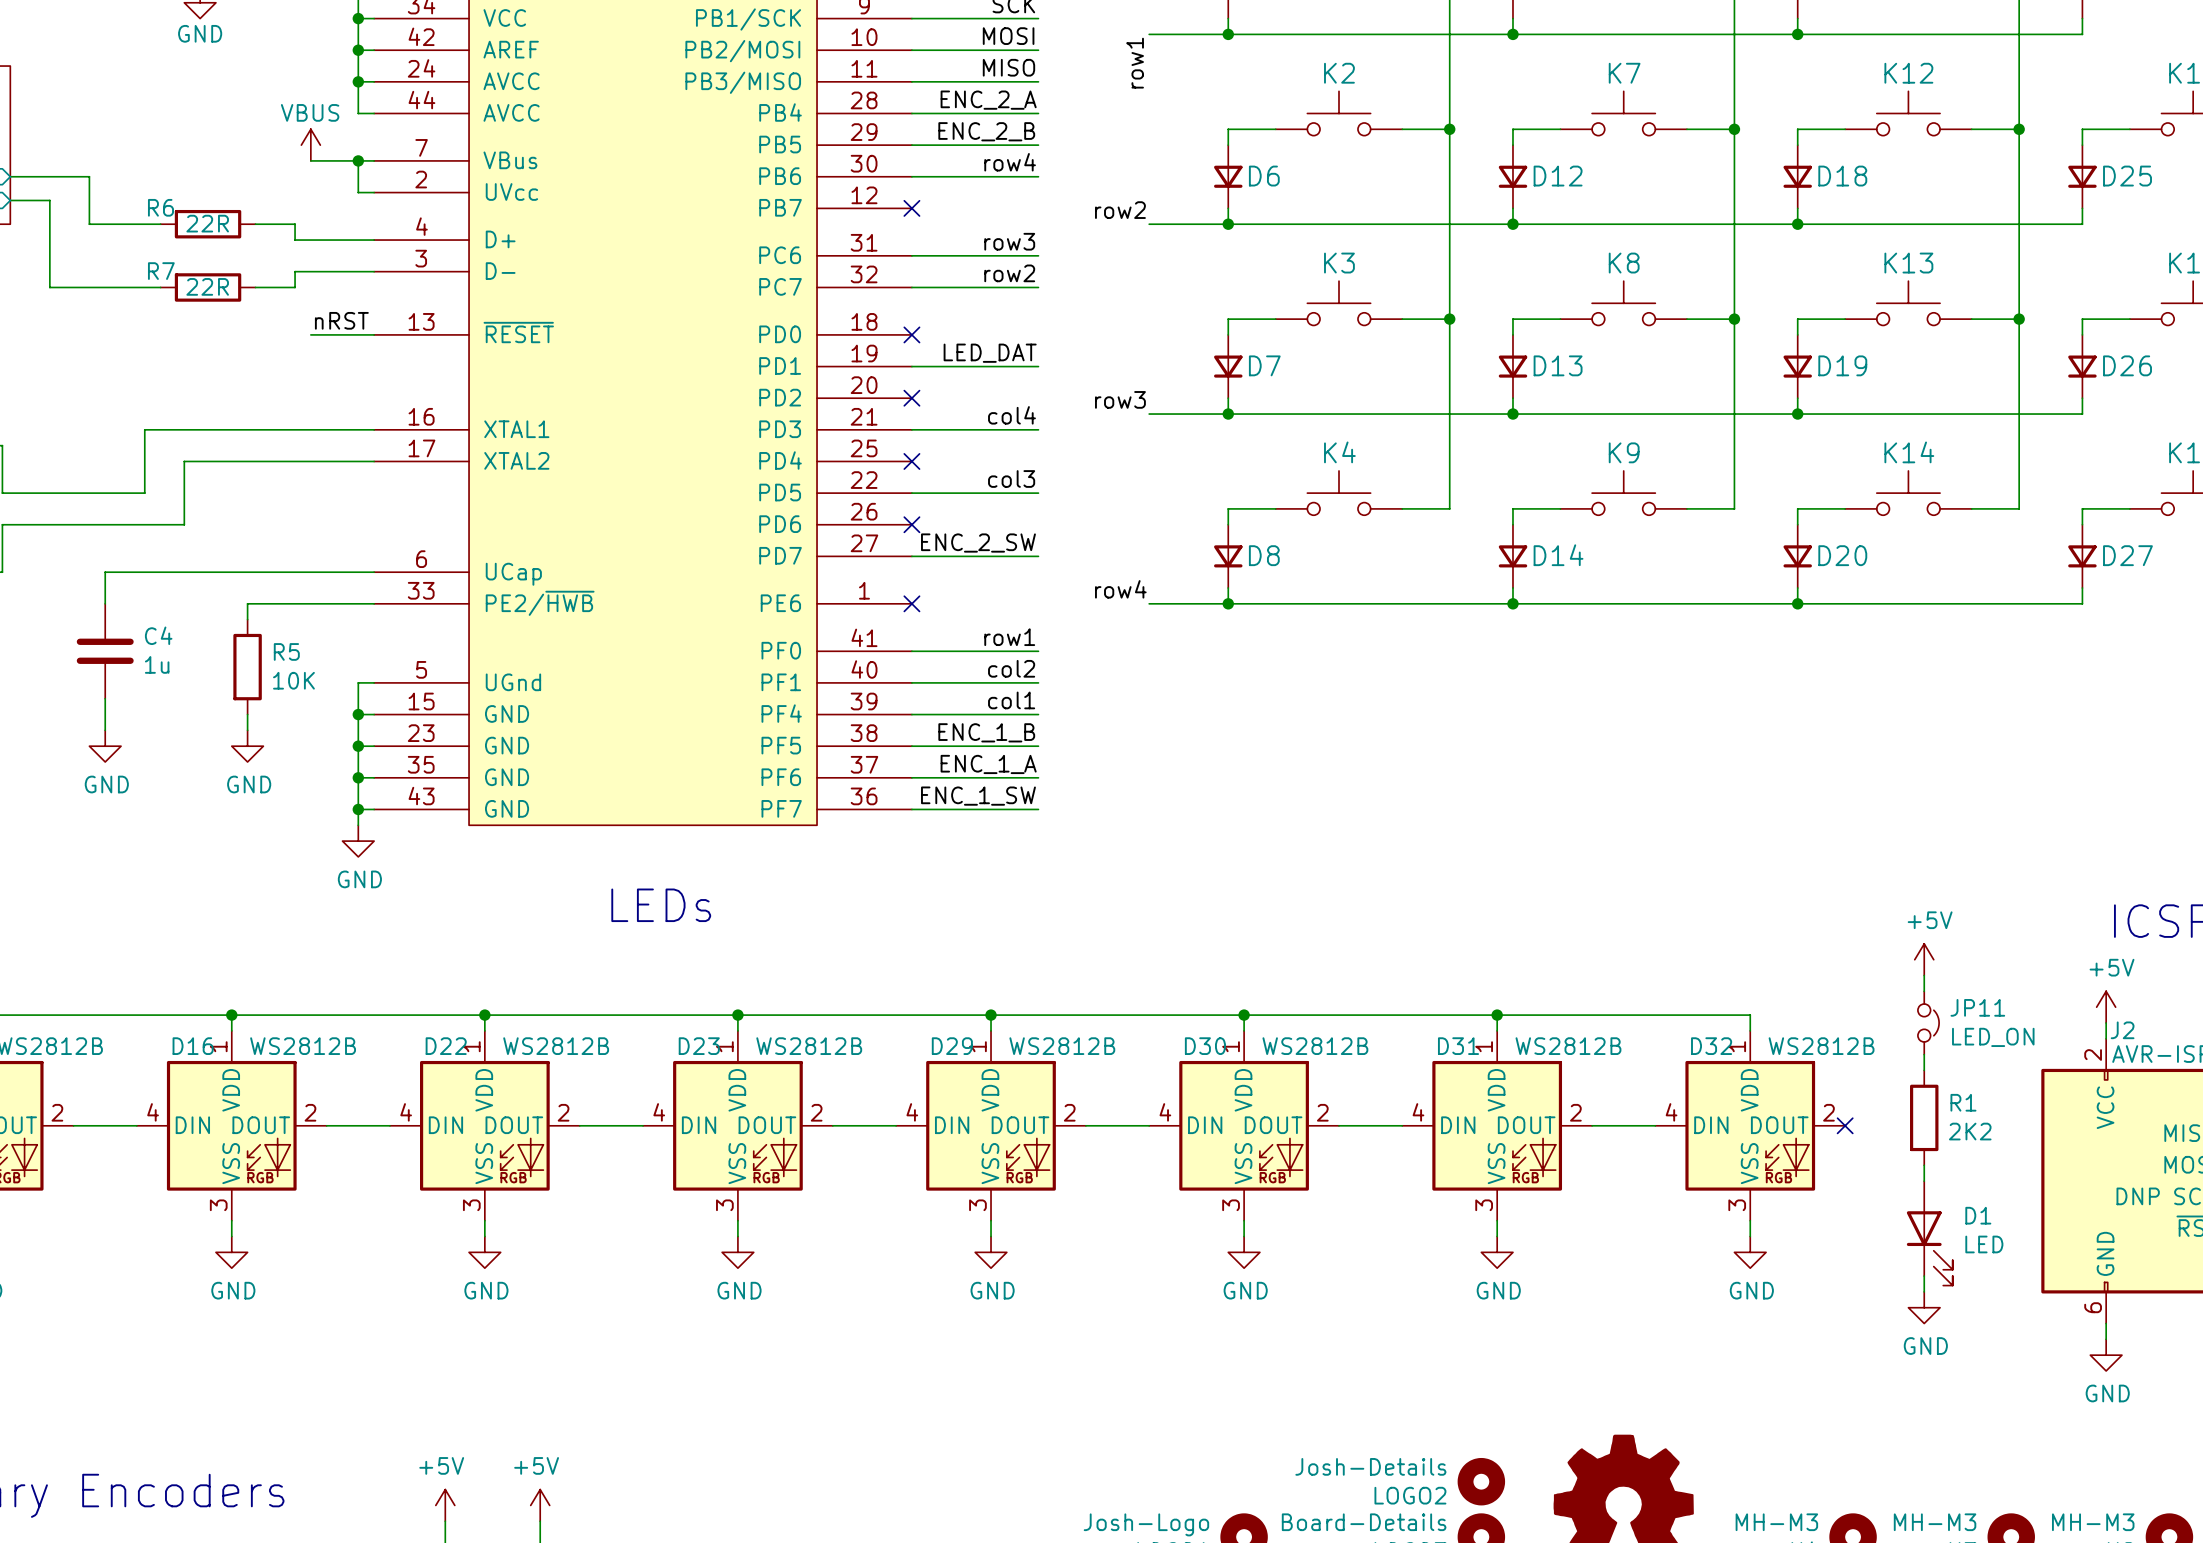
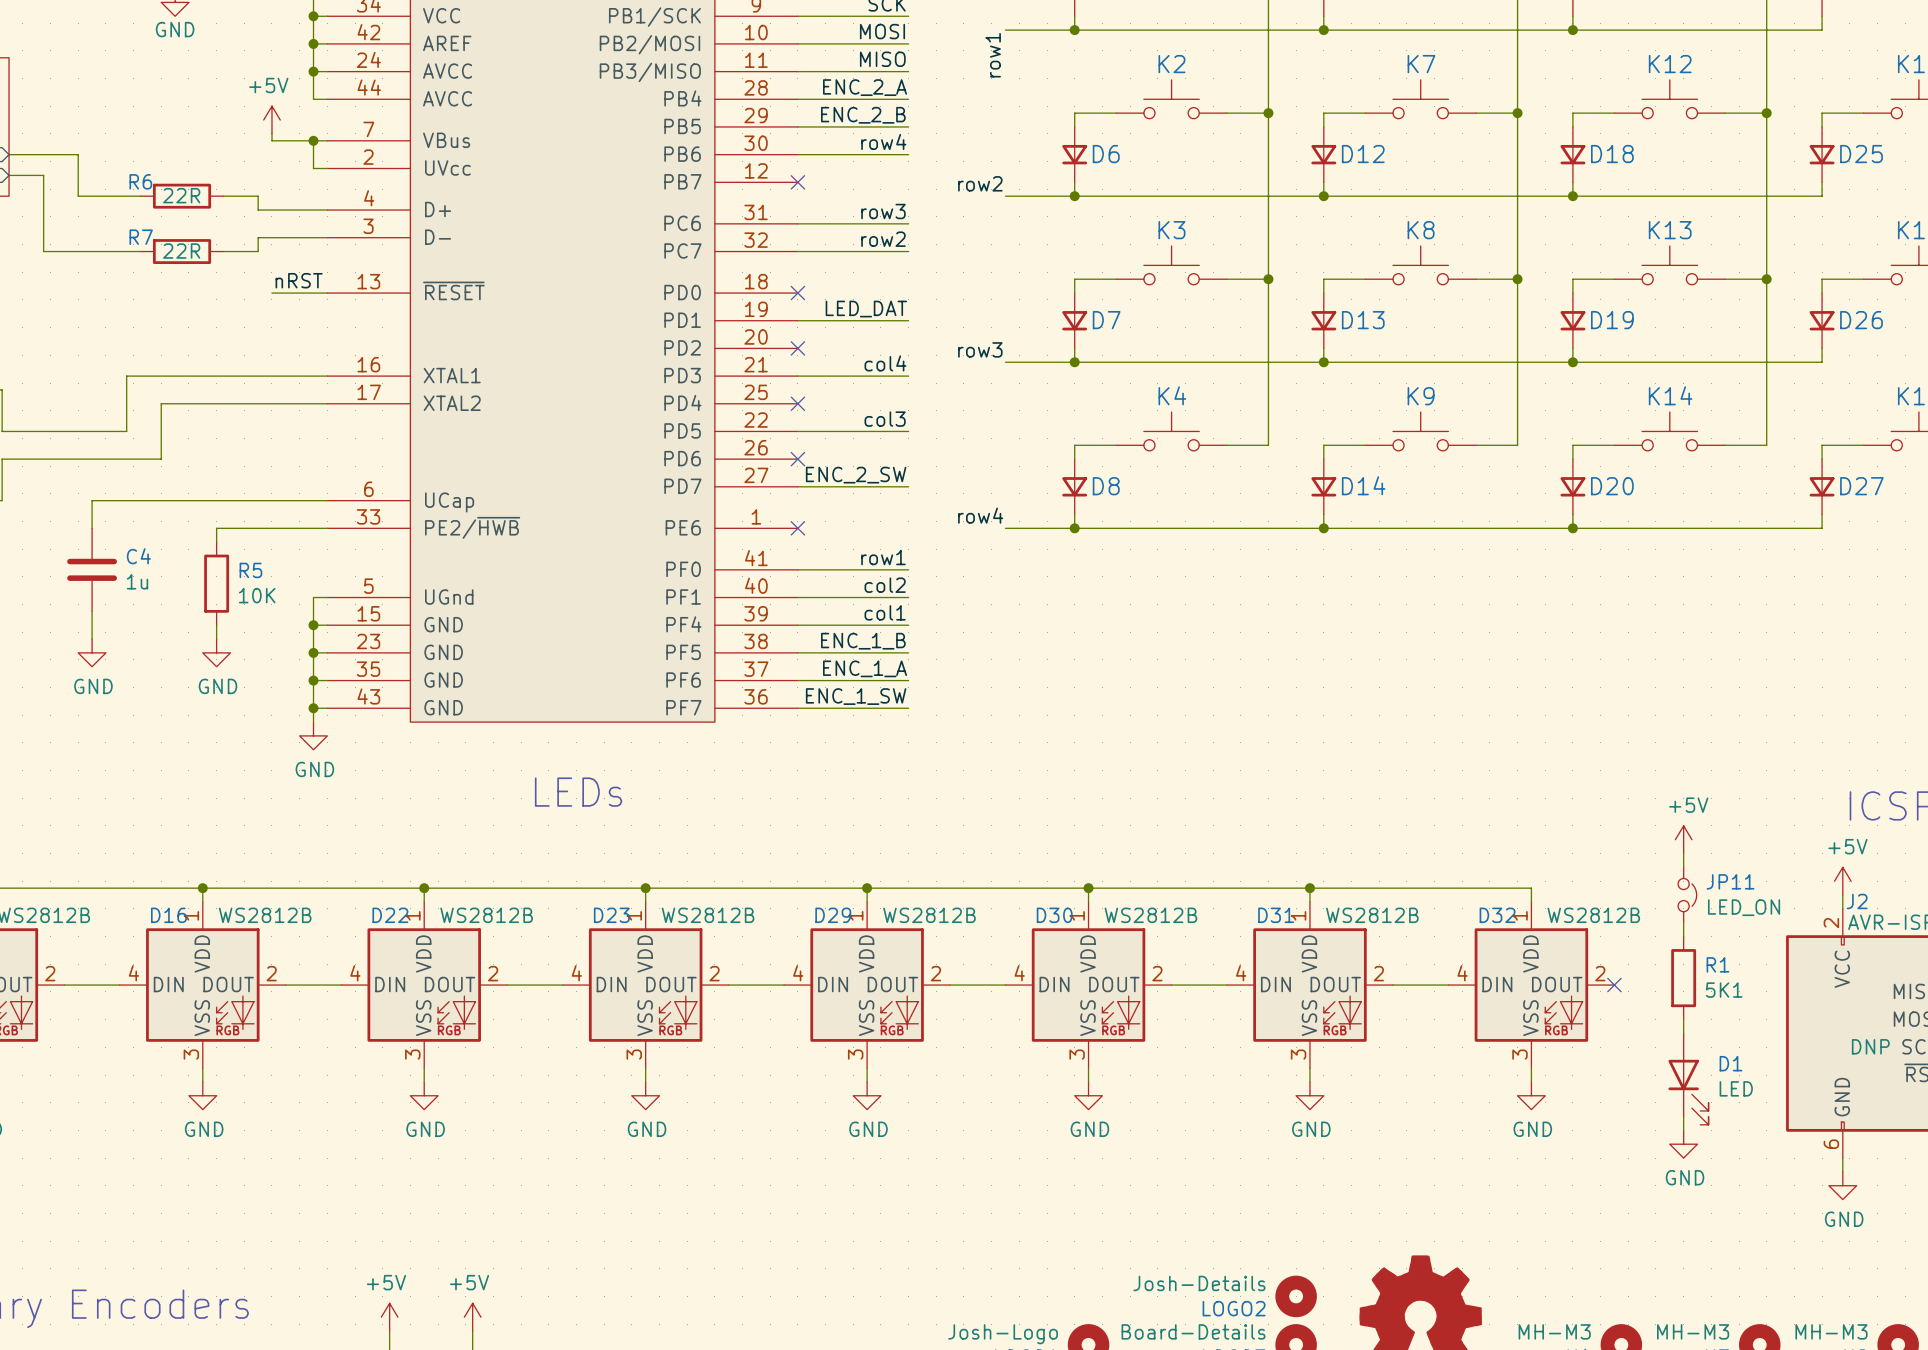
power symbol: VBUS (310, 145) -> +5V (271, 120)
R1 value: 2K2 (1970, 1131) -> 5K1 (1724, 990)

